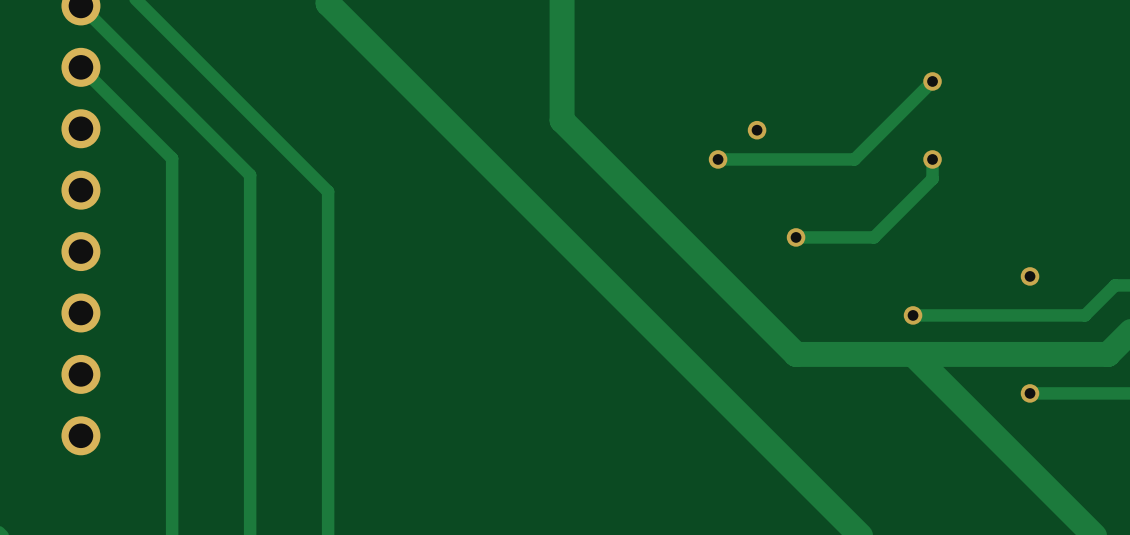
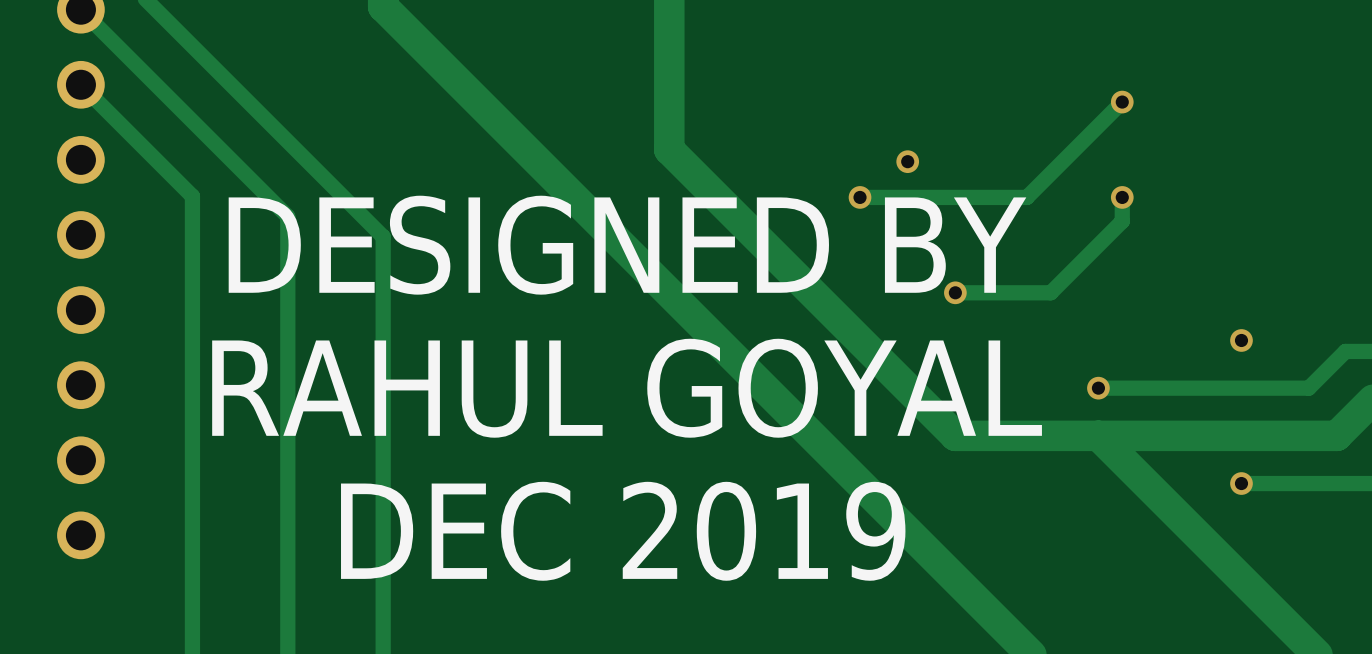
text: none -> DESIGNED BY (627, 245)
text: none -> RAHUL GOYAL (627, 388)
text: none -> DEC 2019 (623, 531)

